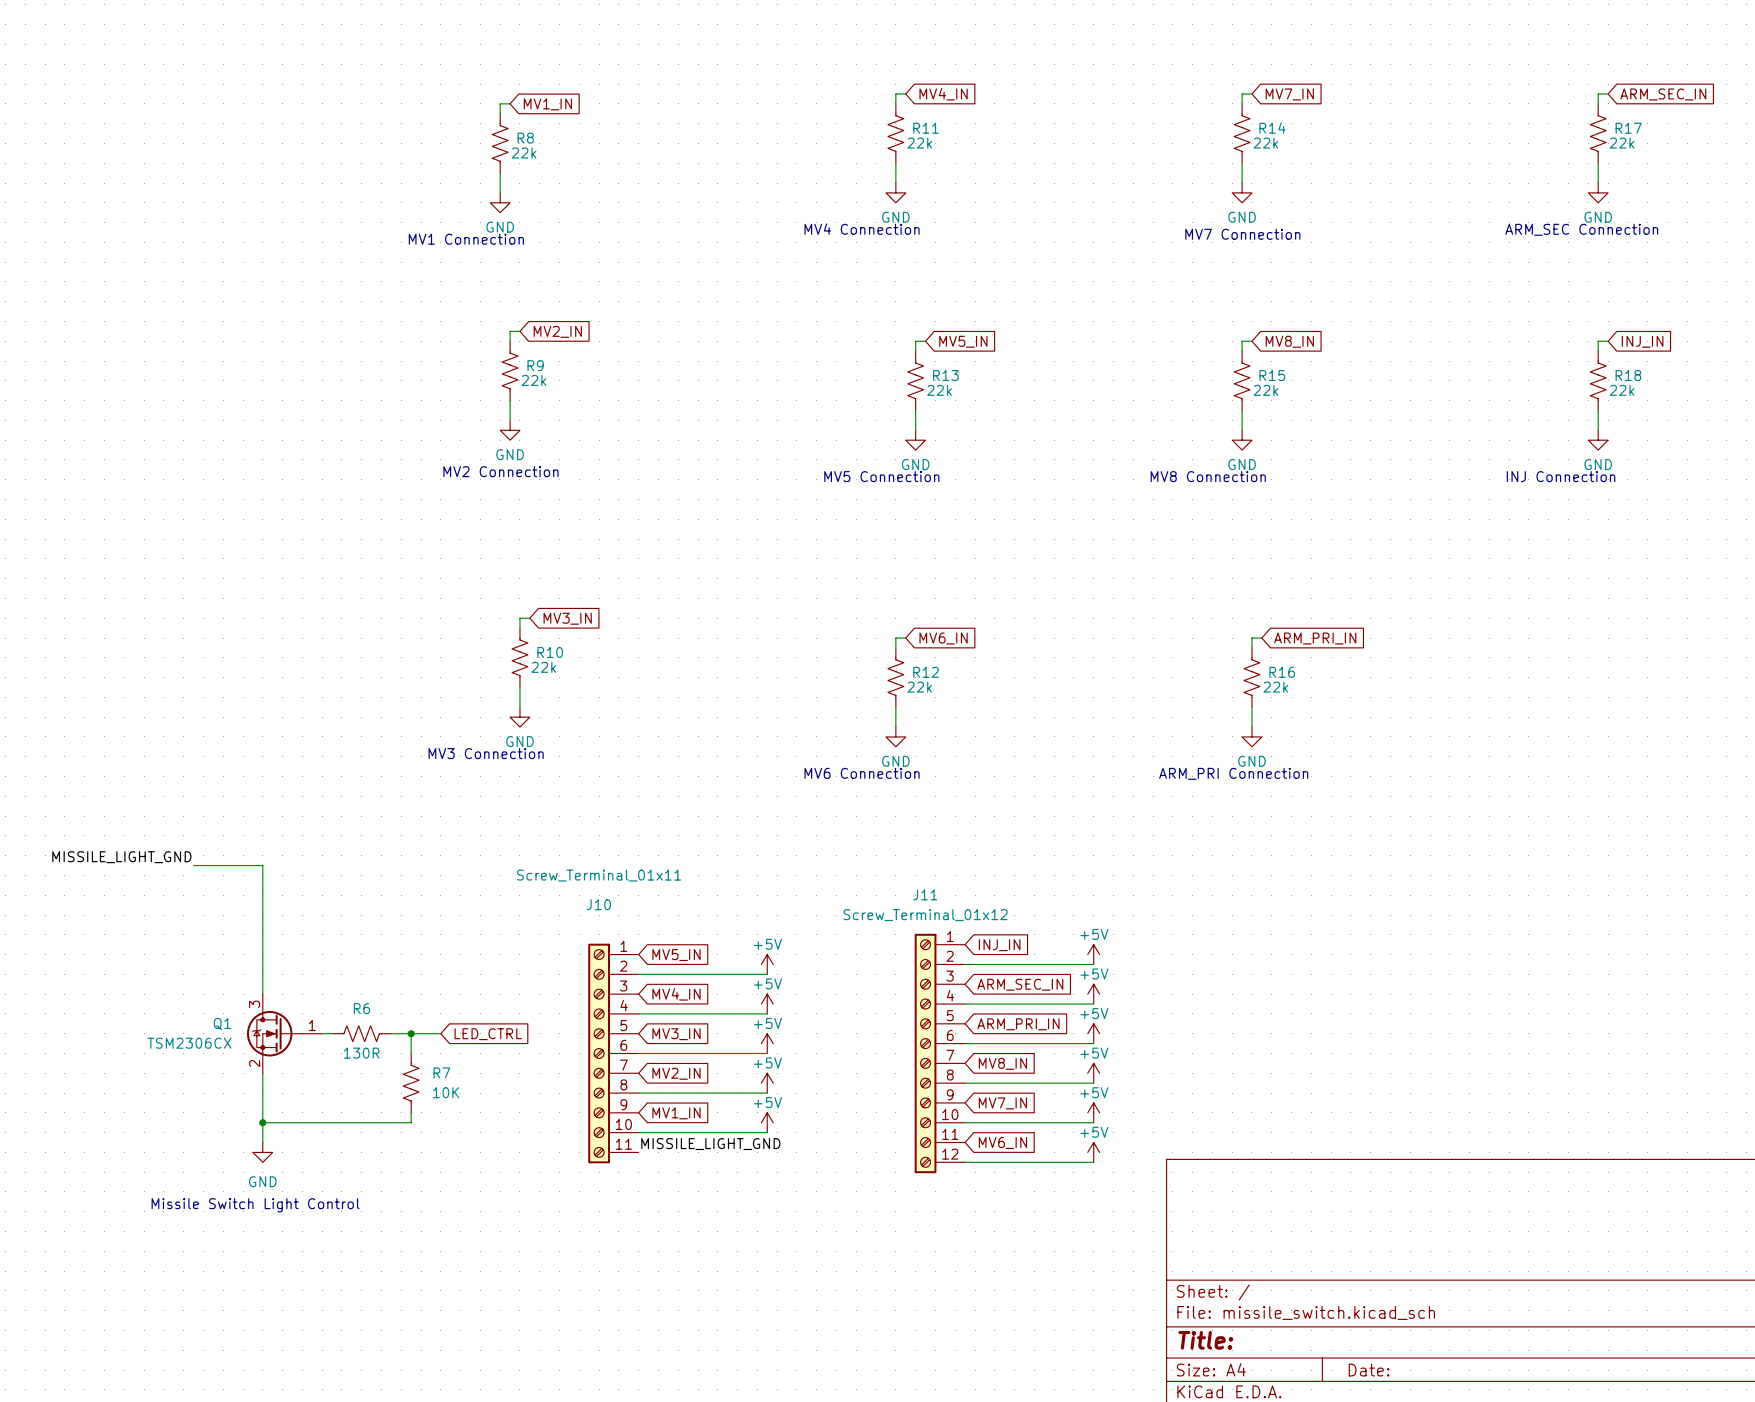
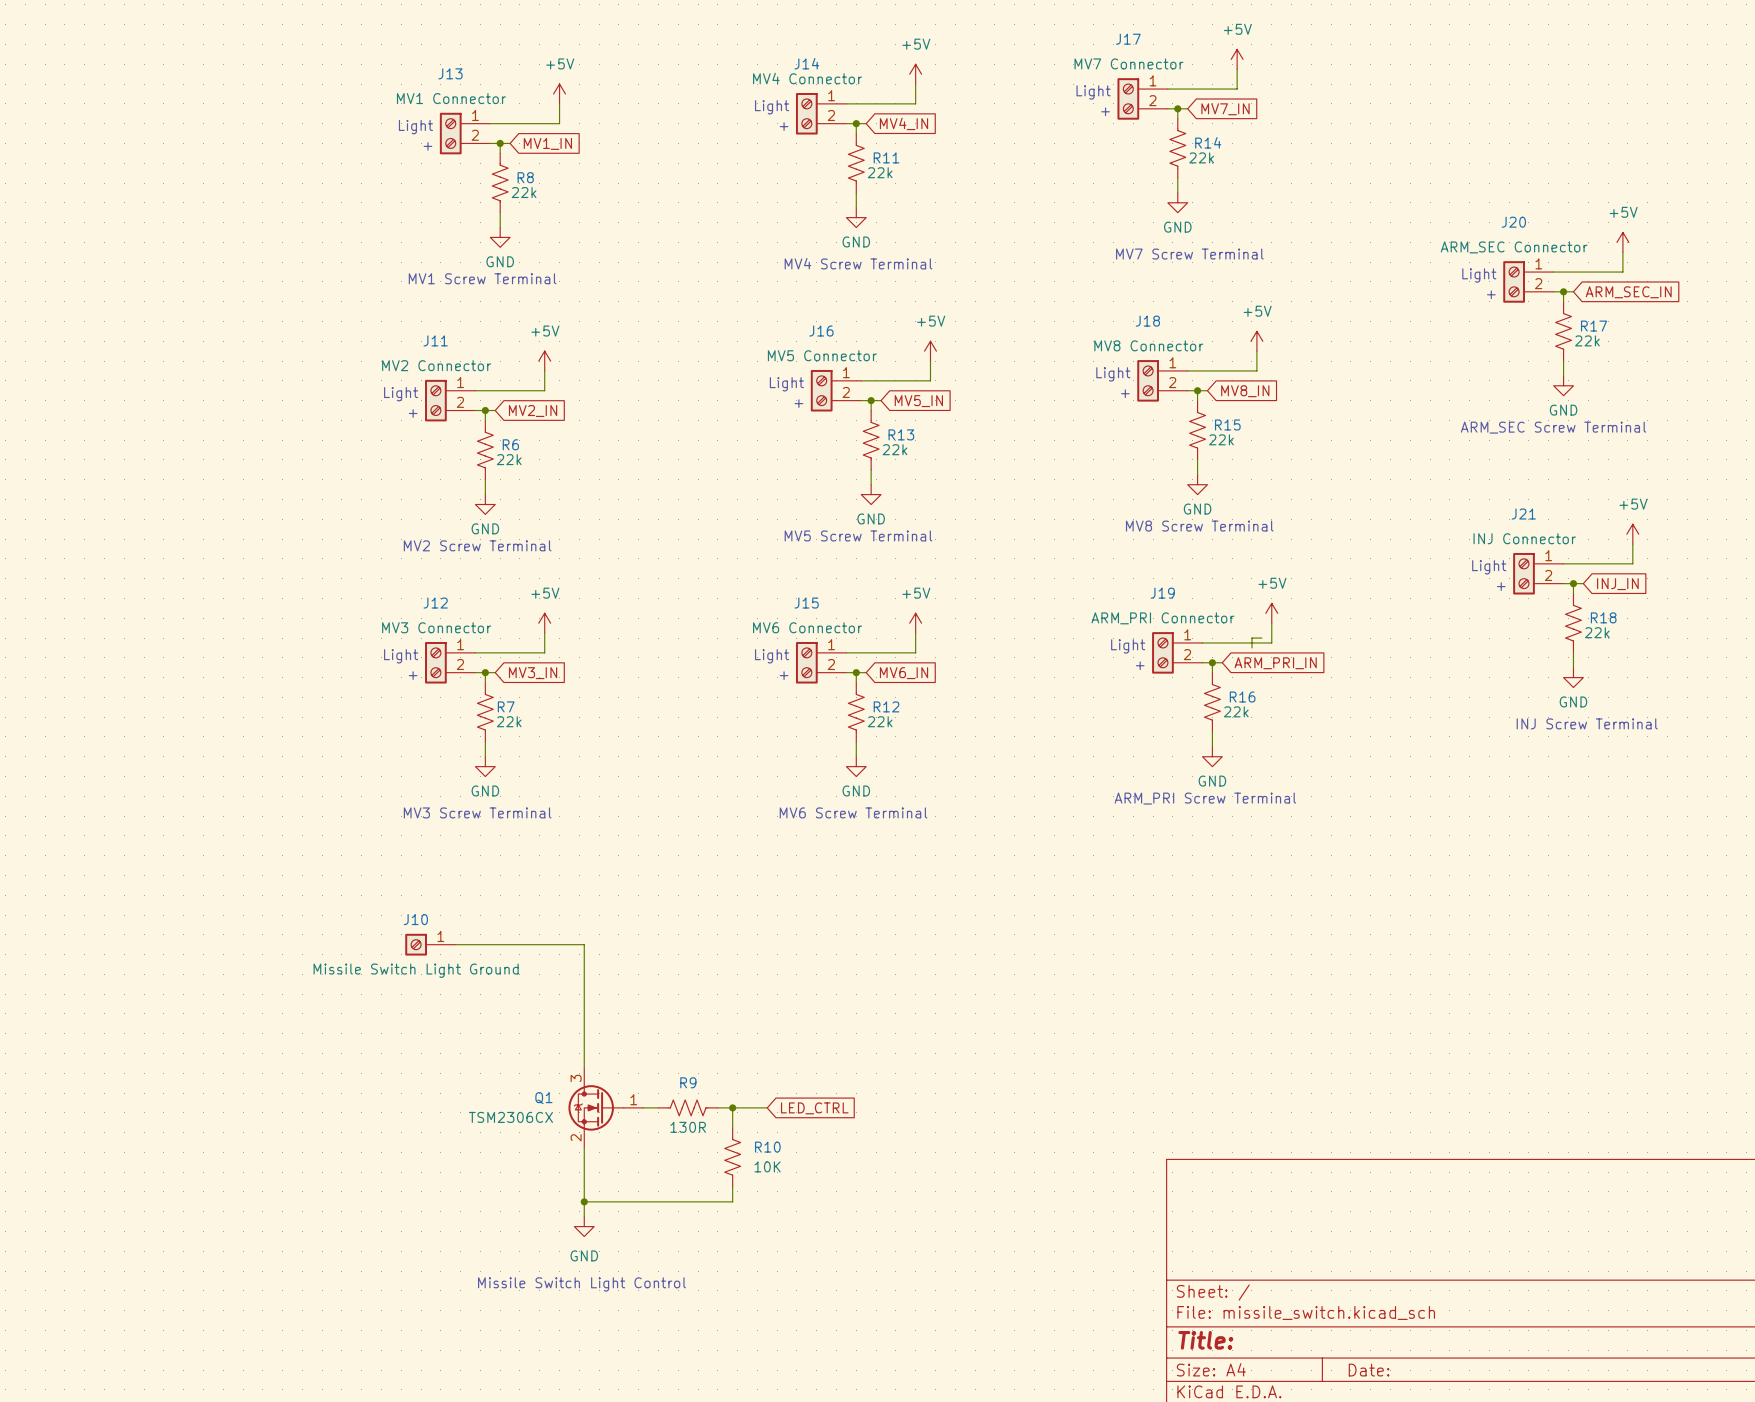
power symbol: none -> +5V (1237, 59)
wire: none -> (1237, 69) (1237, 89) (1167, 89)
power symbol: none -> +5V (915, 74)
wire: none -> (915, 84) (915, 103) (846, 103)
text: none -> Light (1093, 92)
power symbol: none -> +5V (559, 93)
wire: (905, 93) (895, 93) (895, 103) -> none
wire: (1251, 93) (1242, 93) (1242, 103) -> none
wire: (1608, 93) (1598, 93) (1598, 103) -> none
global label position: MV4_IN (943, 94) -> MV4_IN (904, 123)
global label position: MV7_IN (1289, 94) -> MV7_IN (1225, 109)
global label: ARM_SEC_IN (1663, 94) -> none
J17: none -> MV7 Connector (1142, 98)
wire: (510, 103) (500, 103) (500, 113) -> none
wire: none -> (559, 103) (559, 123) (490, 123)
global label position: MV1_IN (547, 104) -> MV1_IN (547, 143)
text: none -> Light (772, 107)
wire: none -> (1167, 108) (1187, 108)
wire: none -> (1177, 108) (1177, 118)
junction: none -> (1177, 108)
text: none -> + (1105, 111)
J14: none -> MV4 Connector (821, 113)
wire: none -> (846, 123) (866, 123)
wire: none -> (856, 123) (856, 133)
junction: none -> (856, 123)
text: none -> + (784, 126)
text: none -> Light (415, 127)
J13: none -> MV1 Connector (465, 133)
R11 position: (895, 133) -> (856, 163)
R14 position: (1242, 133) -> (1177, 148)
R17 position: (1598, 133) -> (1563, 331)
wire: none -> (490, 143) (510, 143)
wire: none -> (500, 143) (500, 153)
junction: none -> (500, 143)
R8 position: (500, 143) -> (500, 183)
text: none -> + (427, 146)
wire: (895, 163) (895, 183) -> none
wire: (1242, 163) (1242, 183) -> none
wire: (1598, 163) (1598, 183) -> none
wire: (500, 173) (500, 192) -> none
wire: none -> (1177, 178) (1177, 192)
wire: none -> (856, 192) (856, 207)
power symbol position: GND (895, 192) -> GND (856, 217)
power symbol position: GND (1242, 192) -> GND (1177, 202)
power symbol: GND (1598, 192) -> none
power symbol position: GND (500, 202) -> GND (500, 237)
wire: none -> (500, 212) (500, 227)
text: MV4 Connection (862, 229) -> none
text: ARM_SEC Connection (1581, 229) -> none
text: MV7 Connection (1242, 234) -> none
text: MV1 Connection (466, 239) -> none
power symbol: none -> +5V (1622, 242)
wire: none -> (1622, 252) (1622, 272) (1553, 272)
text: none -> MV7 Screw Terminal (1189, 254)
text: none -> MV4 Screw Terminal (858, 263)
text: none -> Light (1479, 275)
text: none -> MV1 Screw Terminal (482, 278)
J20: none -> ARM_SEC Connector (1528, 281)
wire: none -> (1553, 291) (1573, 291)
wire: none -> (1563, 291) (1563, 301)
junction: none -> (1563, 291)
global label: none -> ARM_SEC_IN (1628, 292)
text: none -> + (1491, 294)
wire: (519, 331) (510, 331) (510, 341) -> none
global label position: MV2_IN (557, 331) -> MV2_IN (533, 410)
wire: (925, 341) (915, 341) (915, 351) -> none
global label position: MV5_IN (963, 341) -> MV5_IN (918, 401)
wire: (1251, 341) (1242, 341) (1242, 351) -> none
power symbol: none -> +5V (1256, 341)
global label position: MV8_IN (1289, 341) -> MV8_IN (1245, 391)
wire: (1608, 341) (1598, 341) (1598, 351) -> none
global label: INJ_IN (1642, 341) -> none
power symbol: none -> +5V (930, 351)
wire: none -> (1256, 351) (1256, 370) (1187, 370)
power symbol: none -> +5V (544, 361)
wire: none -> (930, 361) (930, 380) (861, 380)
wire: none -> (1563, 361) (1563, 375)
R9 name position: R9 (535, 365) -> R9 (688, 1082)
R9 rotation: 0° (510, 370) -> 90° clockwise (688, 1107)
R9 position: (510, 370) -> (688, 1107)
wire: none -> (544, 370) (544, 390) (475, 390)
text: none -> Light (1113, 374)
R9 value: 22k (533, 380) -> 130R (688, 1127)
R13 position: (915, 380) -> (871, 440)
J18: none -> MV8 Connector (1162, 380)
R15 position: (1242, 380) -> (1197, 430)
R18 position: (1598, 380) -> (1573, 623)
text: none -> Light (786, 384)
J16: none -> MV5 Connector (836, 390)
wire: none -> (1187, 390) (1207, 390)
wire: none -> (1197, 390) (1197, 400)
junction: none -> (1197, 390)
text: none -> + (1125, 393)
text: none -> Light (401, 394)
wire: none -> (861, 400) (881, 400)
wire: none -> (871, 400) (871, 410)
junction: none -> (871, 400)
text: none -> + (798, 403)
wire: none -> (475, 410) (495, 410)
wire: none -> (485, 410) (485, 420)
junction: none -> (485, 410)
wire: (915, 410) (915, 430) -> none
wire: (1242, 410) (1242, 430) -> none
wire: (1598, 410) (1598, 430) -> none
text: none -> + (413, 413)
text: none -> ARM_SEC Screw Terminal (1553, 427)
power symbol position: GND (510, 430) -> GND (485, 504)
power symbol position: GND (915, 440) -> GND (871, 494)
power symbol position: GND (1242, 440) -> GND (1197, 484)
power symbol position: GND (1598, 440) -> GND (1563, 385)
wire: none -> (1197, 459) (1197, 474)
wire: none -> (871, 469) (871, 484)
text: MV2 Connection (500, 471) -> none
text: MV5 Connection (881, 476) -> none
text: MV8 Connection (1208, 476) -> none
text: INJ Connection (1561, 476) -> none
wire: none -> (485, 479) (485, 494)
text: none -> MV8 Screw Terminal (1199, 526)
power symbol: none -> +5V (1632, 534)
text: none -> MV5 Screw Terminal (858, 535)
wire: none -> (1632, 544) (1632, 563) (1563, 563)
text: none -> MV2 Screw Terminal (477, 545)
text: none -> Light (1489, 567)
J21: none -> INJ Connector (1538, 573)
wire: none -> (1563, 583) (1583, 583)
wire: none -> (1573, 583) (1573, 593)
junction: none -> (1573, 583)
global label: none -> INJ_IN (1617, 584)
text: none -> + (1501, 586)
power symbol: none -> +5V (1271, 613)
wire: (529, 618) (519, 618) (519, 628) -> none
global label position: MV3_IN (567, 618) -> MV3_IN (533, 673)
power symbol: none -> +5V (544, 623)
power symbol: none -> +5V (915, 623)
wire: none -> (1271, 623) (1271, 642) (1202, 642)
wire: none -> (544, 633) (544, 652) (475, 652)
wire: none -> (915, 633) (915, 652) (846, 652)
wire: (905, 638) (895, 638) (895, 647) -> none
global label position: MV6_IN (943, 638) -> MV6_IN (904, 673)
global label position: ARM_PRI_IN (1315, 638) -> ARM_PRI_IN (1275, 663)
text: none -> Light (1128, 646)
R10 name position: R10 (550, 652) -> R10 (767, 1147)
J19: none -> ARM_PRI Connector (1177, 652)
wire: none -> (1573, 652) (1573, 667)
text: none -> Light (401, 656)
text: none -> Light (772, 656)
R10 position: (519, 657) -> (732, 1157)
J12: none -> MV3 Connector (450, 662)
J15: none -> MV6 Connector (821, 662)
wire: none -> (1202, 662) (1222, 662)
wire: none -> (1212, 662) (1212, 672)
junction: none -> (1212, 662)
text: none -> + (1140, 665)
R10 value: 22k (543, 667) -> 10K (767, 1166)
wire: none -> (475, 672) (495, 672)
wire: none -> (485, 672) (485, 682)
junction: none -> (485, 672)
wire: none -> (846, 672) (866, 672)
wire: none -> (856, 672) (856, 682)
junction: none -> (856, 672)
text: none -> + (413, 675)
text: none -> + (784, 675)
R12 position: (895, 677) -> (856, 712)
R16 position: (1251, 677) -> (1212, 702)
power symbol: none -> GND (1573, 677)
wire: (519, 687) (519, 707) -> none
wire: (895, 707) (895, 727) -> none
wire: (1251, 707) (1251, 727) -> none
power symbol position: GND (519, 717) -> GND (485, 766)
text: none -> INJ Screw Terminal (1587, 723)
wire: none -> (1212, 732) (1212, 746)
power symbol position: GND (895, 736) -> GND (856, 766)
power symbol position: GND (1251, 736) -> GND (1212, 756)
wire: none -> (485, 741) (485, 756)
wire: none -> (856, 741) (856, 756)
text: MV3 Connection (486, 753) -> none
text: MV6 Connection (862, 773) -> none
text: ARM_PRI Connection (1233, 773) -> none
text: none -> ARM_PRI Screw Terminal (1205, 798)
text: none -> MV3 Screw Terminal (477, 812)
text: none -> MV6 Screw Terminal (853, 812)
label: MISSILE_LIGHT_GND (121, 857) -> none
wire: (193, 865) (262, 865) (262, 994) -> none
J10 value: Screw_Terminal_01x11 (599, 875) -> Missile Switch Light Ground (416, 970)
J11 name position: J11 (925, 894) -> J11 (435, 340)
J10 name position: J10 (598, 904) -> J10 (415, 919)
J11 value: Screw_Terminal_01x12 (925, 915) -> MV2 Connector (436, 365)
J11 symbol: [914, 933, 966, 1174] -> [425, 379, 476, 422]
J10 symbol: [588, 943, 639, 1164] -> [405, 933, 456, 956]
wire: none -> (455, 944) (584, 944) (584, 1068)
global label: INJ_IN (999, 945) -> none
power symbol: +5V (1093, 954) -> none
global label: MV5_IN (676, 955) -> none
power symbol: +5V (767, 964) -> none
wire: (965, 964) (1093, 964) -> none
wire: (638, 974) (767, 974) -> none
global label: ARM_SEC_IN (1020, 984) -> none
global label: MV4_IN (676, 994) -> none
power symbol: +5V (1093, 994) -> none
power symbol: +5V (767, 1004) -> none
wire: (965, 1004) (1093, 1004) -> none
wire: (638, 1013) (767, 1013) -> none
global label: ARM_PRI_IN (1018, 1024) -> none
Q1 position: (284, 1033) -> (606, 1107)
wire: (322, 1033) (332, 1033) -> none
R6 rotation: 0° (361, 1033) -> 90° clockwise (485, 450)
R6 position: (361, 1033) -> (485, 450)
wire: (391, 1033) (440, 1033) -> none
wire: (411, 1033) (411, 1053) -> none
junction: (411, 1033) -> none
power symbol: +5V (1093, 1033) -> none
global label: LED_CTRL (488, 1034) -> none
global label: MV3_IN (676, 1034) -> none
power symbol: +5V (767, 1043) -> none
wire: (965, 1043) (1093, 1043) -> none
R6 value: 130R (361, 1053) -> 22k (509, 459)
wire: (638, 1053) (767, 1053) -> none
global label: MV8_IN (1002, 1063) -> none
R7 name position: R7 (441, 1072) -> R7 (506, 706)
wire: (262, 1073) (262, 1142) -> none
global label: MV2_IN (676, 1073) -> none
power symbol: +5V (1093, 1073) -> none
R7 position: (411, 1083) -> (485, 712)
power symbol: +5V (767, 1083) -> none
wire: (965, 1083) (1093, 1083) -> none
R7 value: 10K (446, 1092) -> 22k (509, 721)
wire: (638, 1093) (767, 1093) -> none
global label: MV7_IN (1002, 1103) -> none
wire: none -> (643, 1107) (658, 1107)
wire: none -> (717, 1107) (767, 1107)
wire: none -> (732, 1107) (732, 1127)
junction: none -> (732, 1107)
global label: none -> LED_CTRL (814, 1108)
wire: (411, 1112) (411, 1122) (262, 1122) -> none
power symbol: +5V (1093, 1112) -> none
global label: MV1_IN (676, 1113) -> none
junction: (262, 1122) -> none
power symbol: +5V (767, 1122) -> none
wire: (965, 1122) (1093, 1122) -> none
wire: (638, 1132) (767, 1132) -> none
global label: MV6_IN (1002, 1142) -> none
label: MISSILE_LIGHT_GND (710, 1144) -> none
wire: none -> (584, 1147) (584, 1216)
power symbol: GND (262, 1152) -> none
power symbol: +5V (1093, 1152) -> none
wire: (965, 1162) (1093, 1162) -> none
wire: none -> (732, 1187) (732, 1201) (584, 1201)
junction: none -> (584, 1201)
text: Missile Switch Light Control (255, 1205) -> none
power symbol: none -> GND (584, 1226)
text: none -> Missile Switch Light Control (581, 1284)

